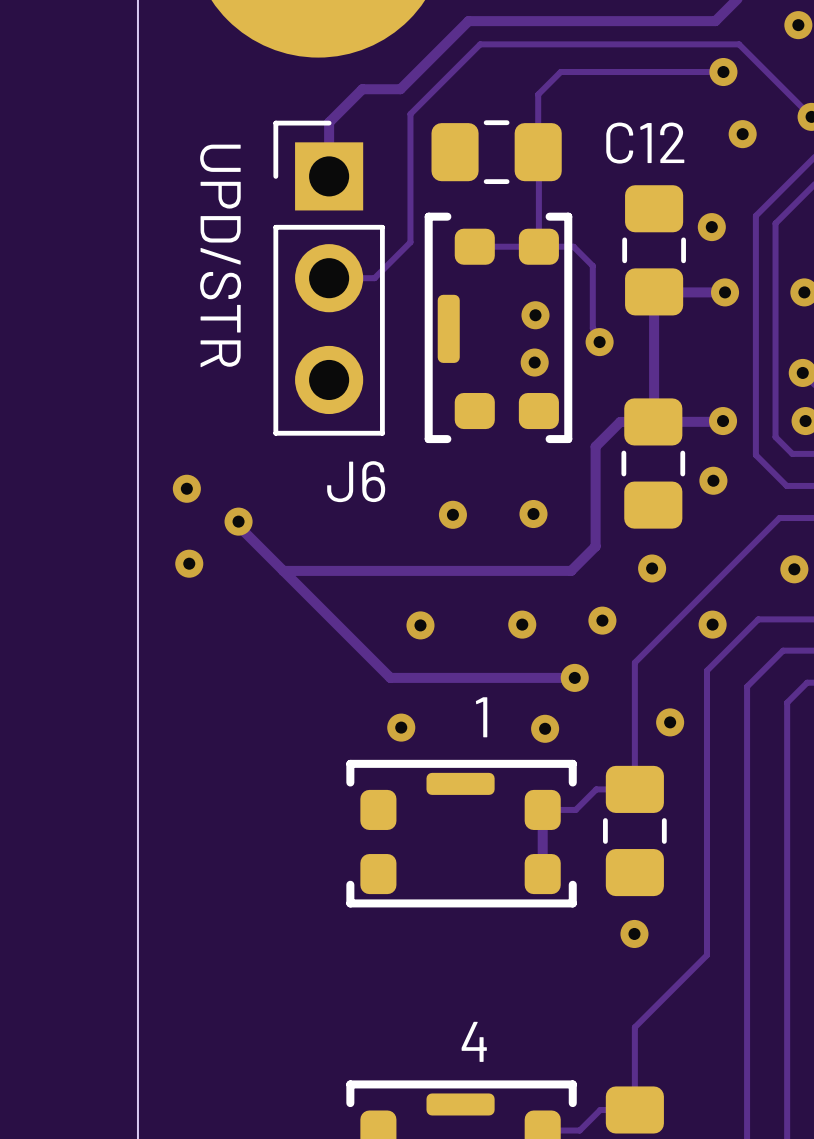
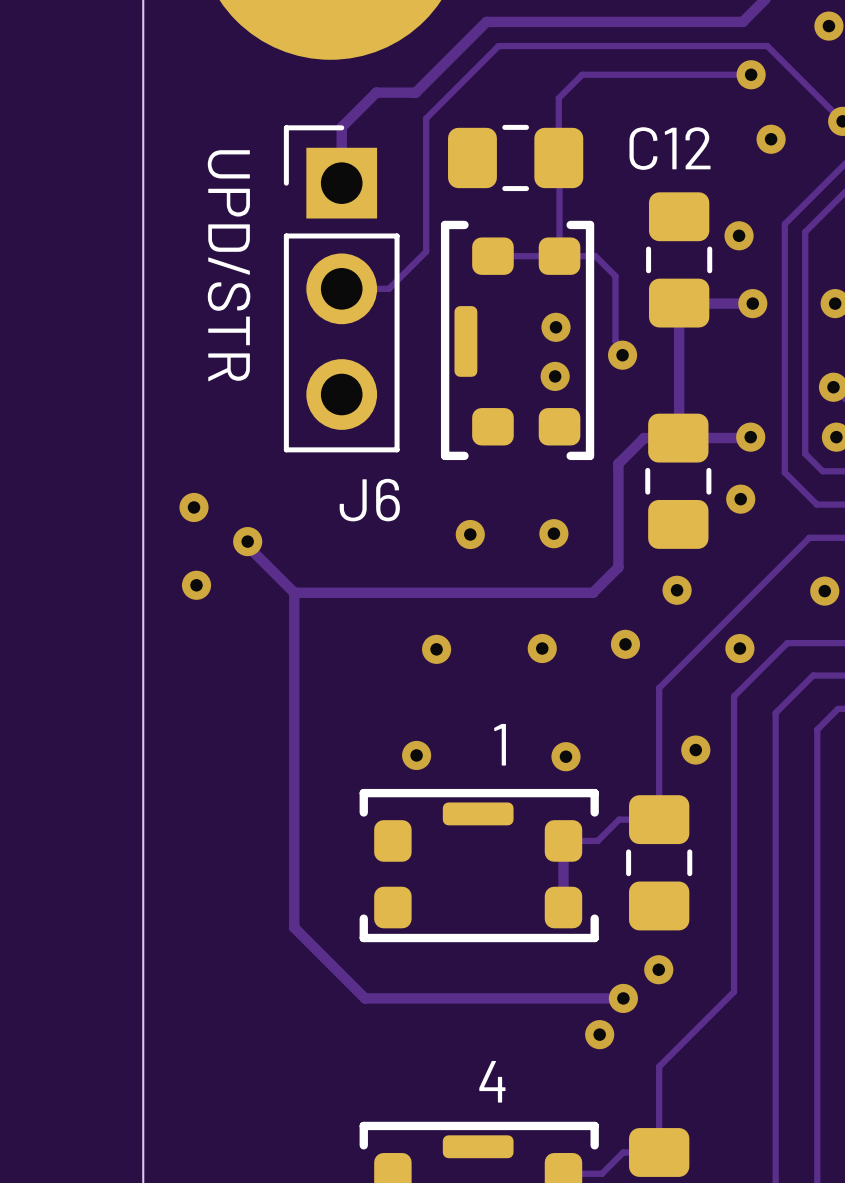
track: (283, 570) (390, 677) (574, 677) -> (294, 592) (294, 927) (365, 998) (623, 998)
via: (574, 677) -> none
via: none -> (623, 998)
via: none -> (599, 1034)

